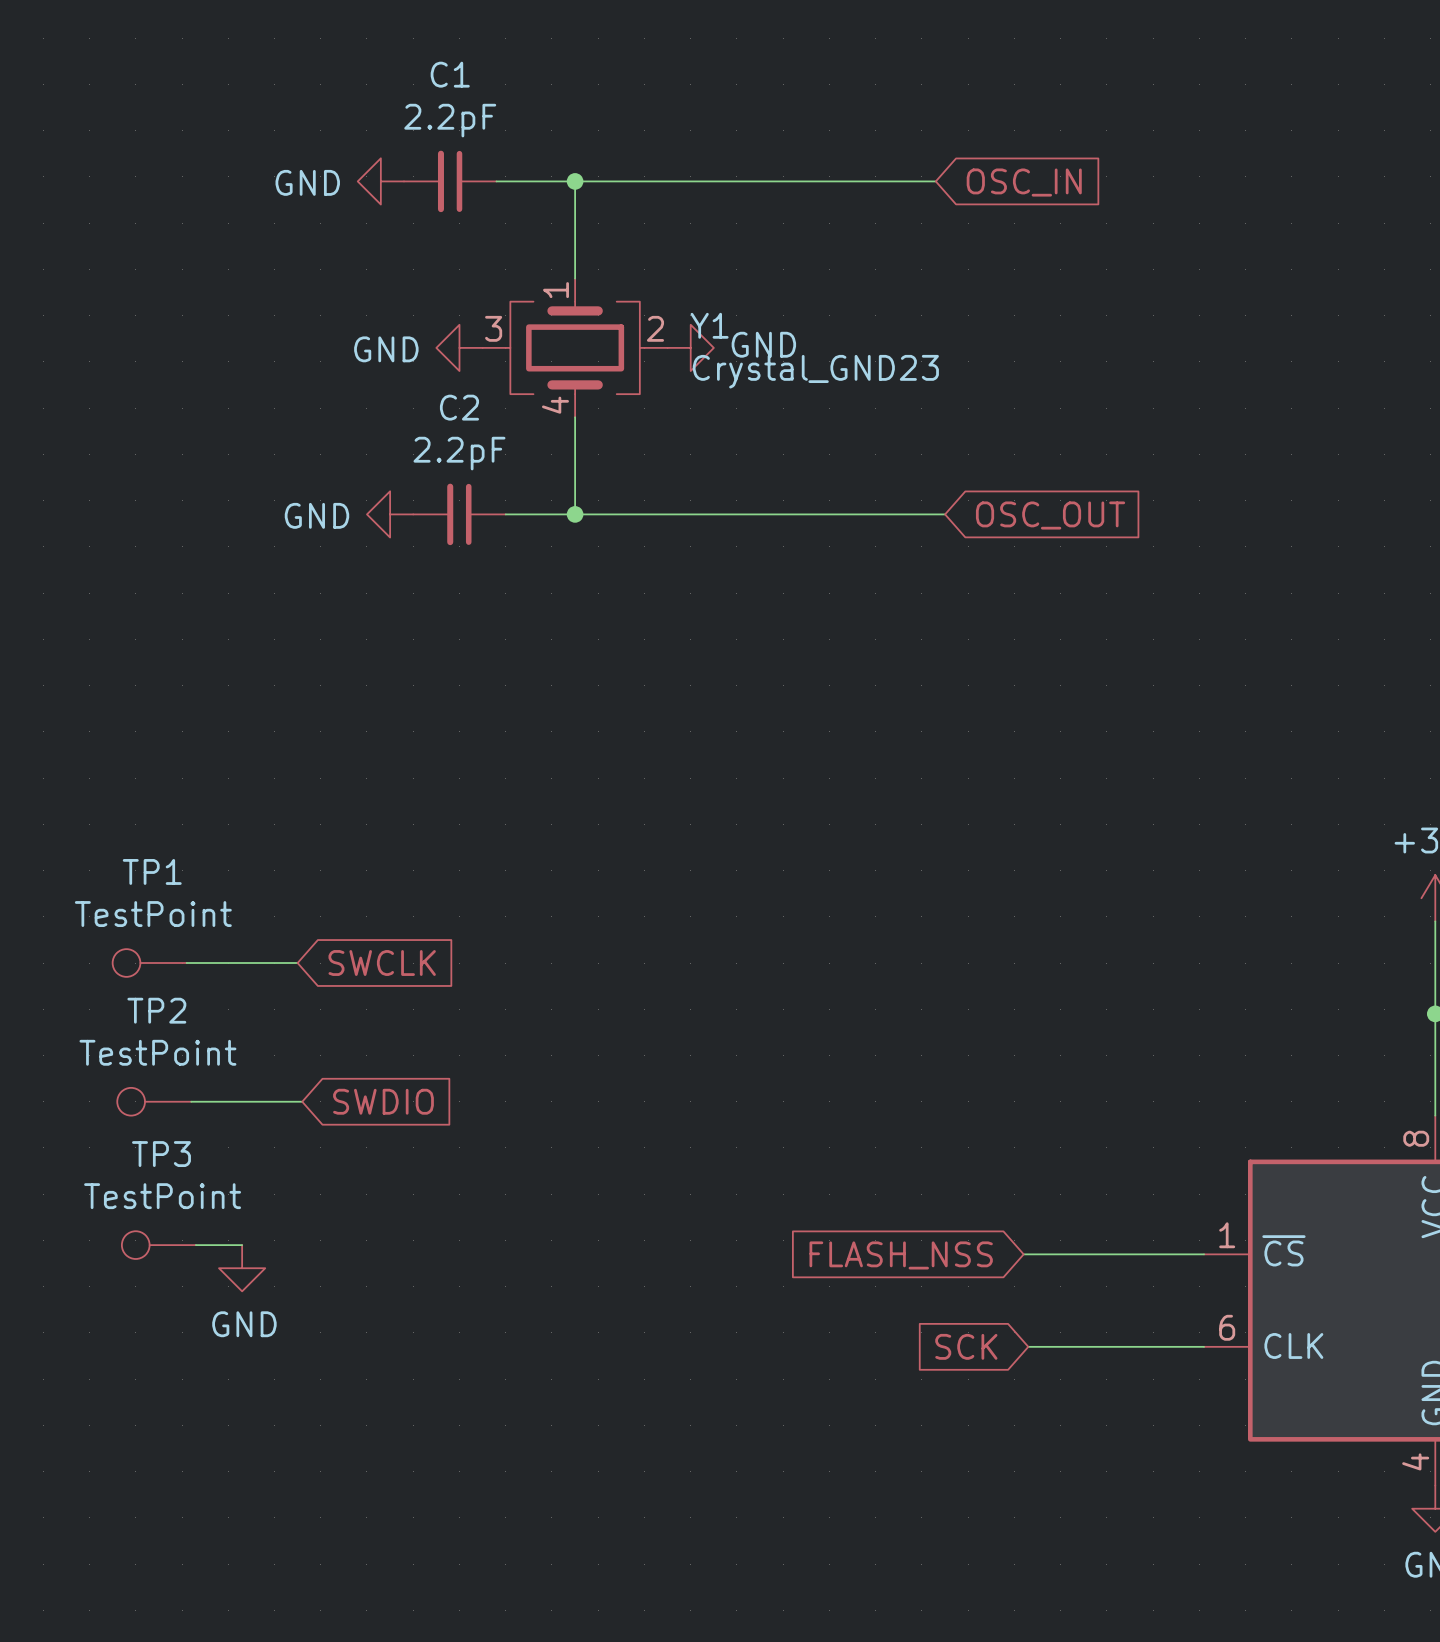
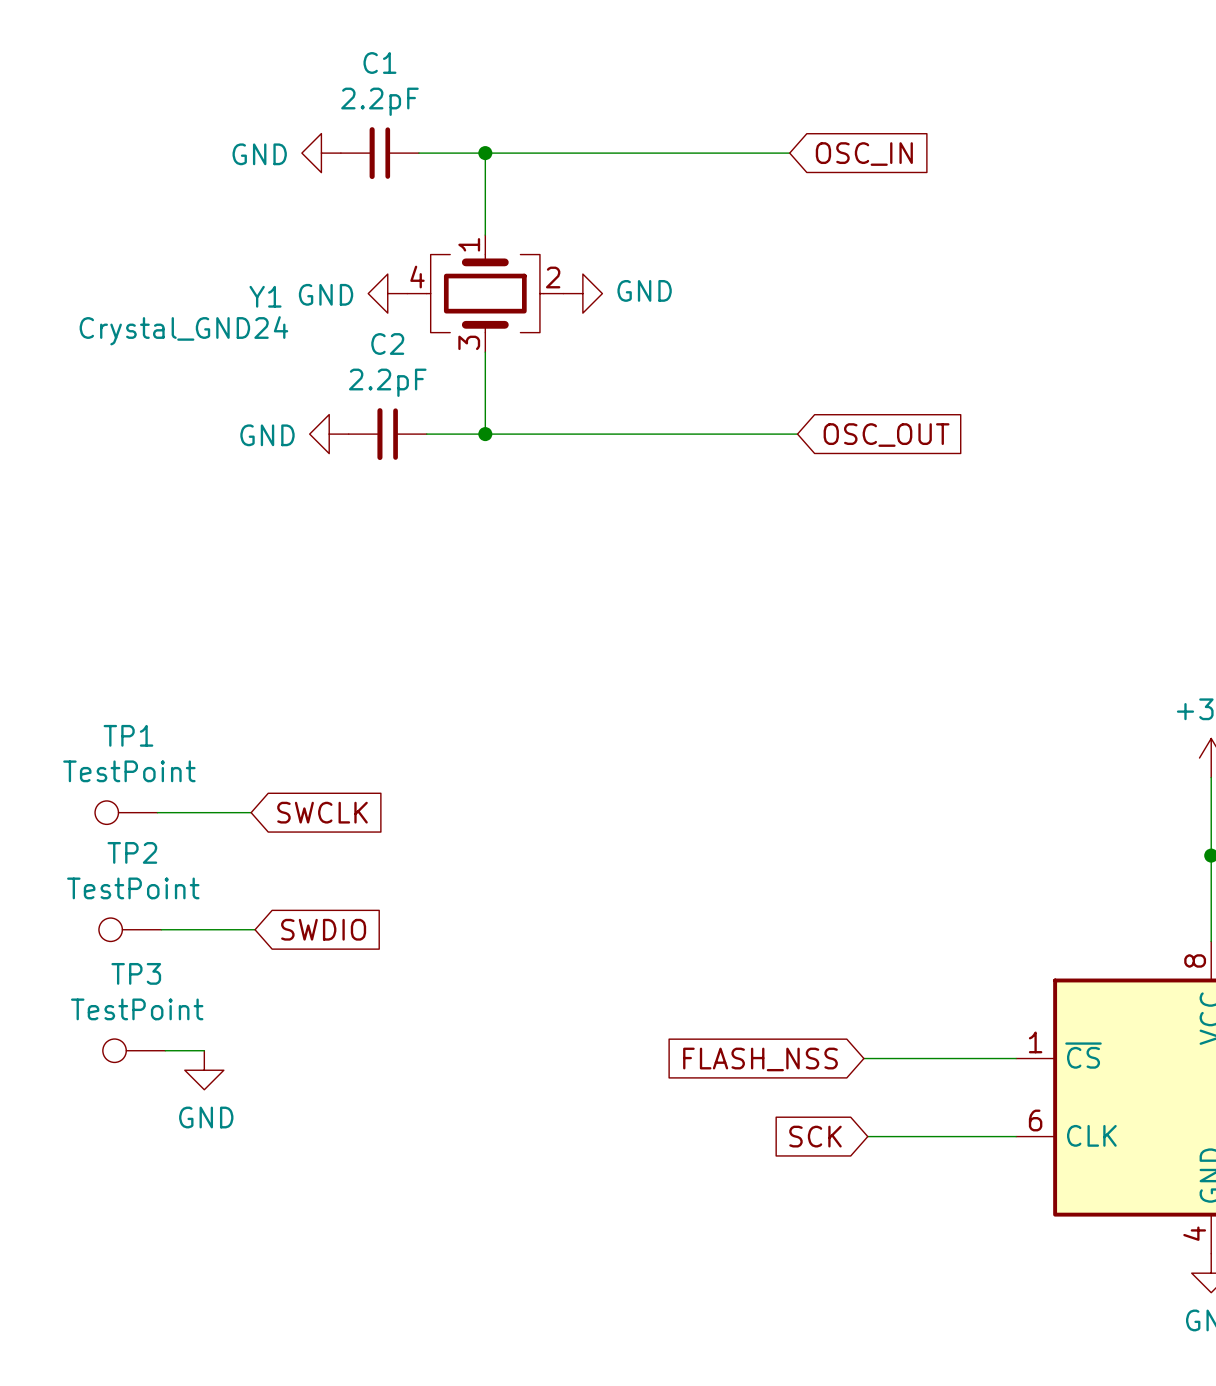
Y1 name position: Y1 (709, 325) -> Y1 (265, 296)
Y1 pin number: 3 (493, 328) -> 4 (417, 277)
Y1 value: Crystal_GND23 (815, 371) -> Crystal_GND24 (183, 330)
Y1 pin number: 4 (555, 405) -> 3 (469, 342)

